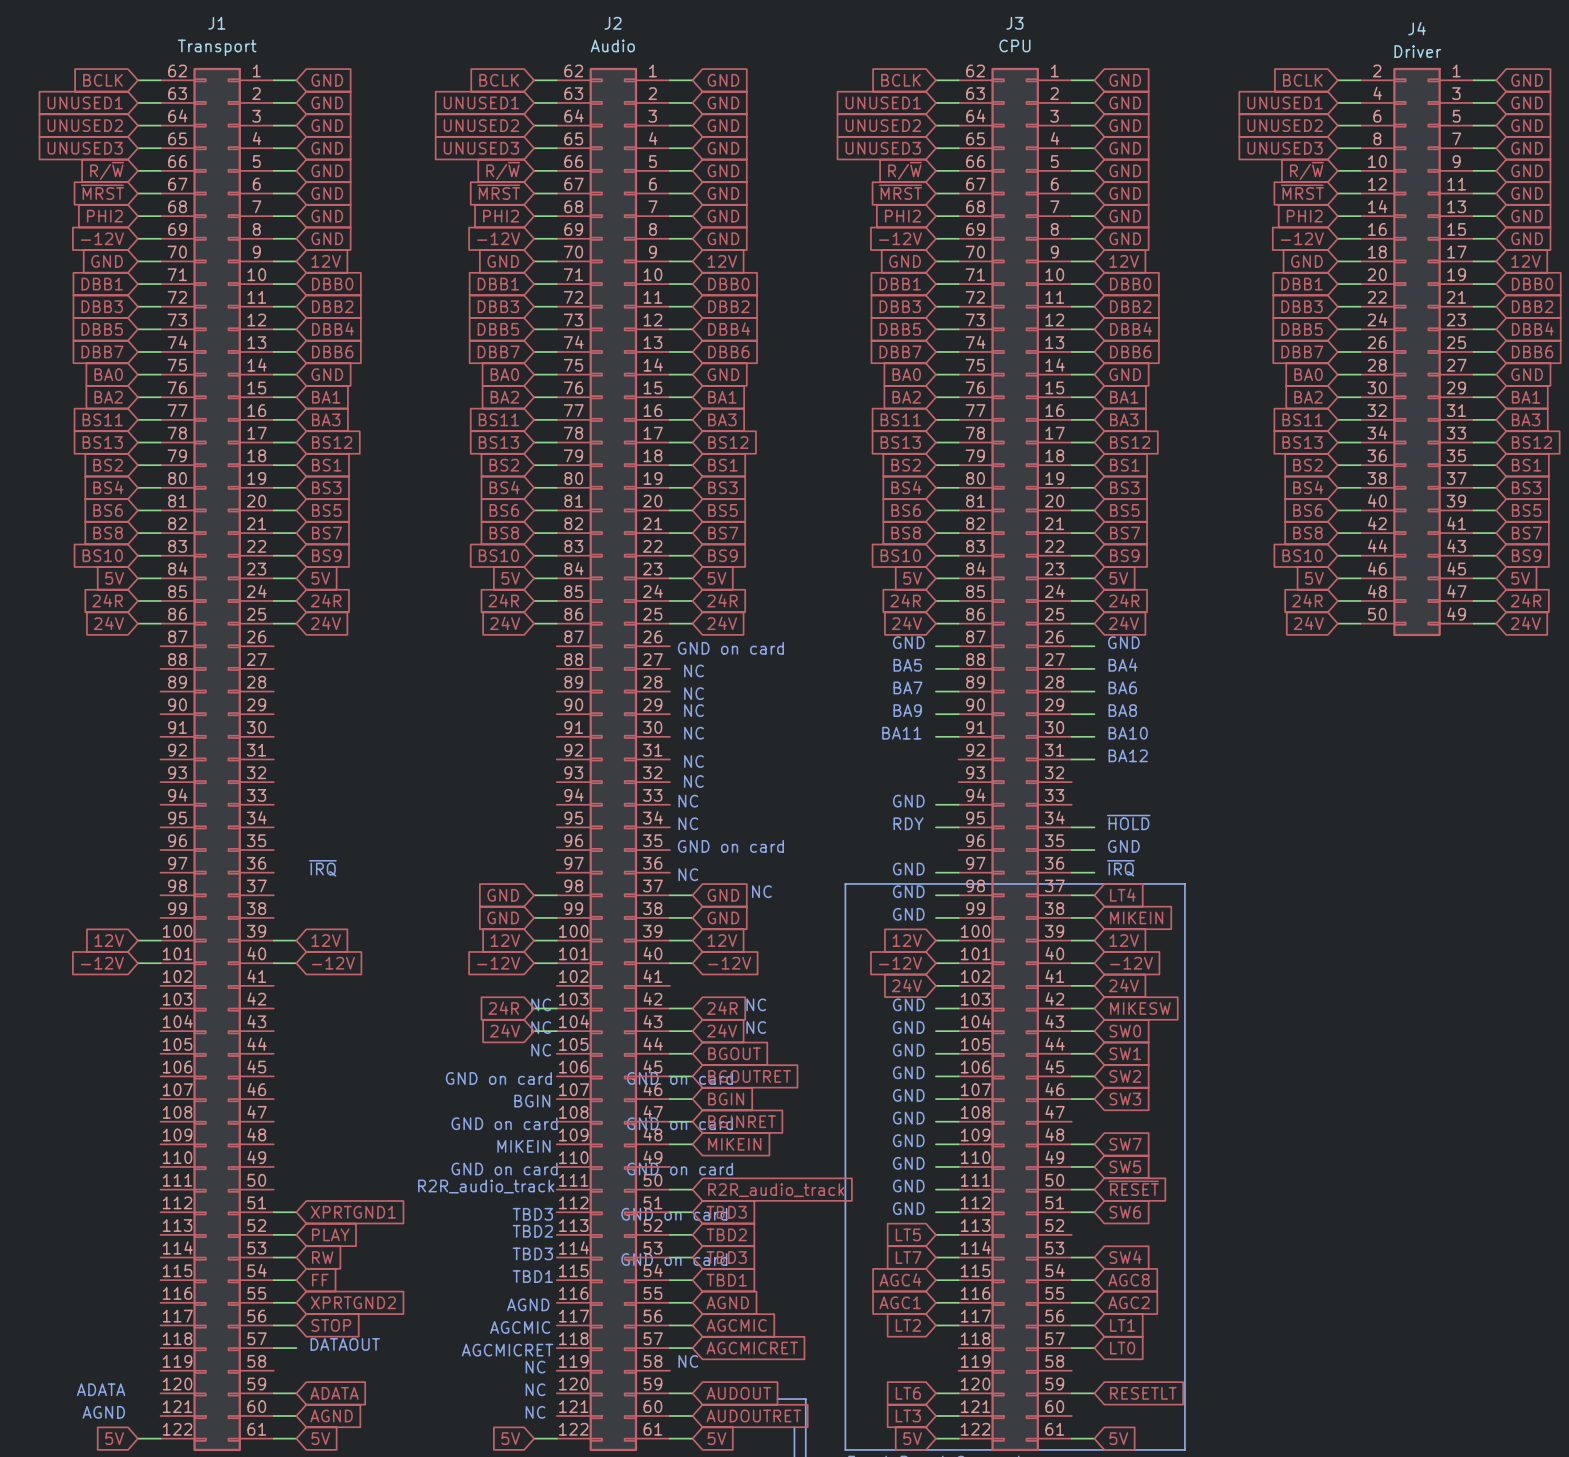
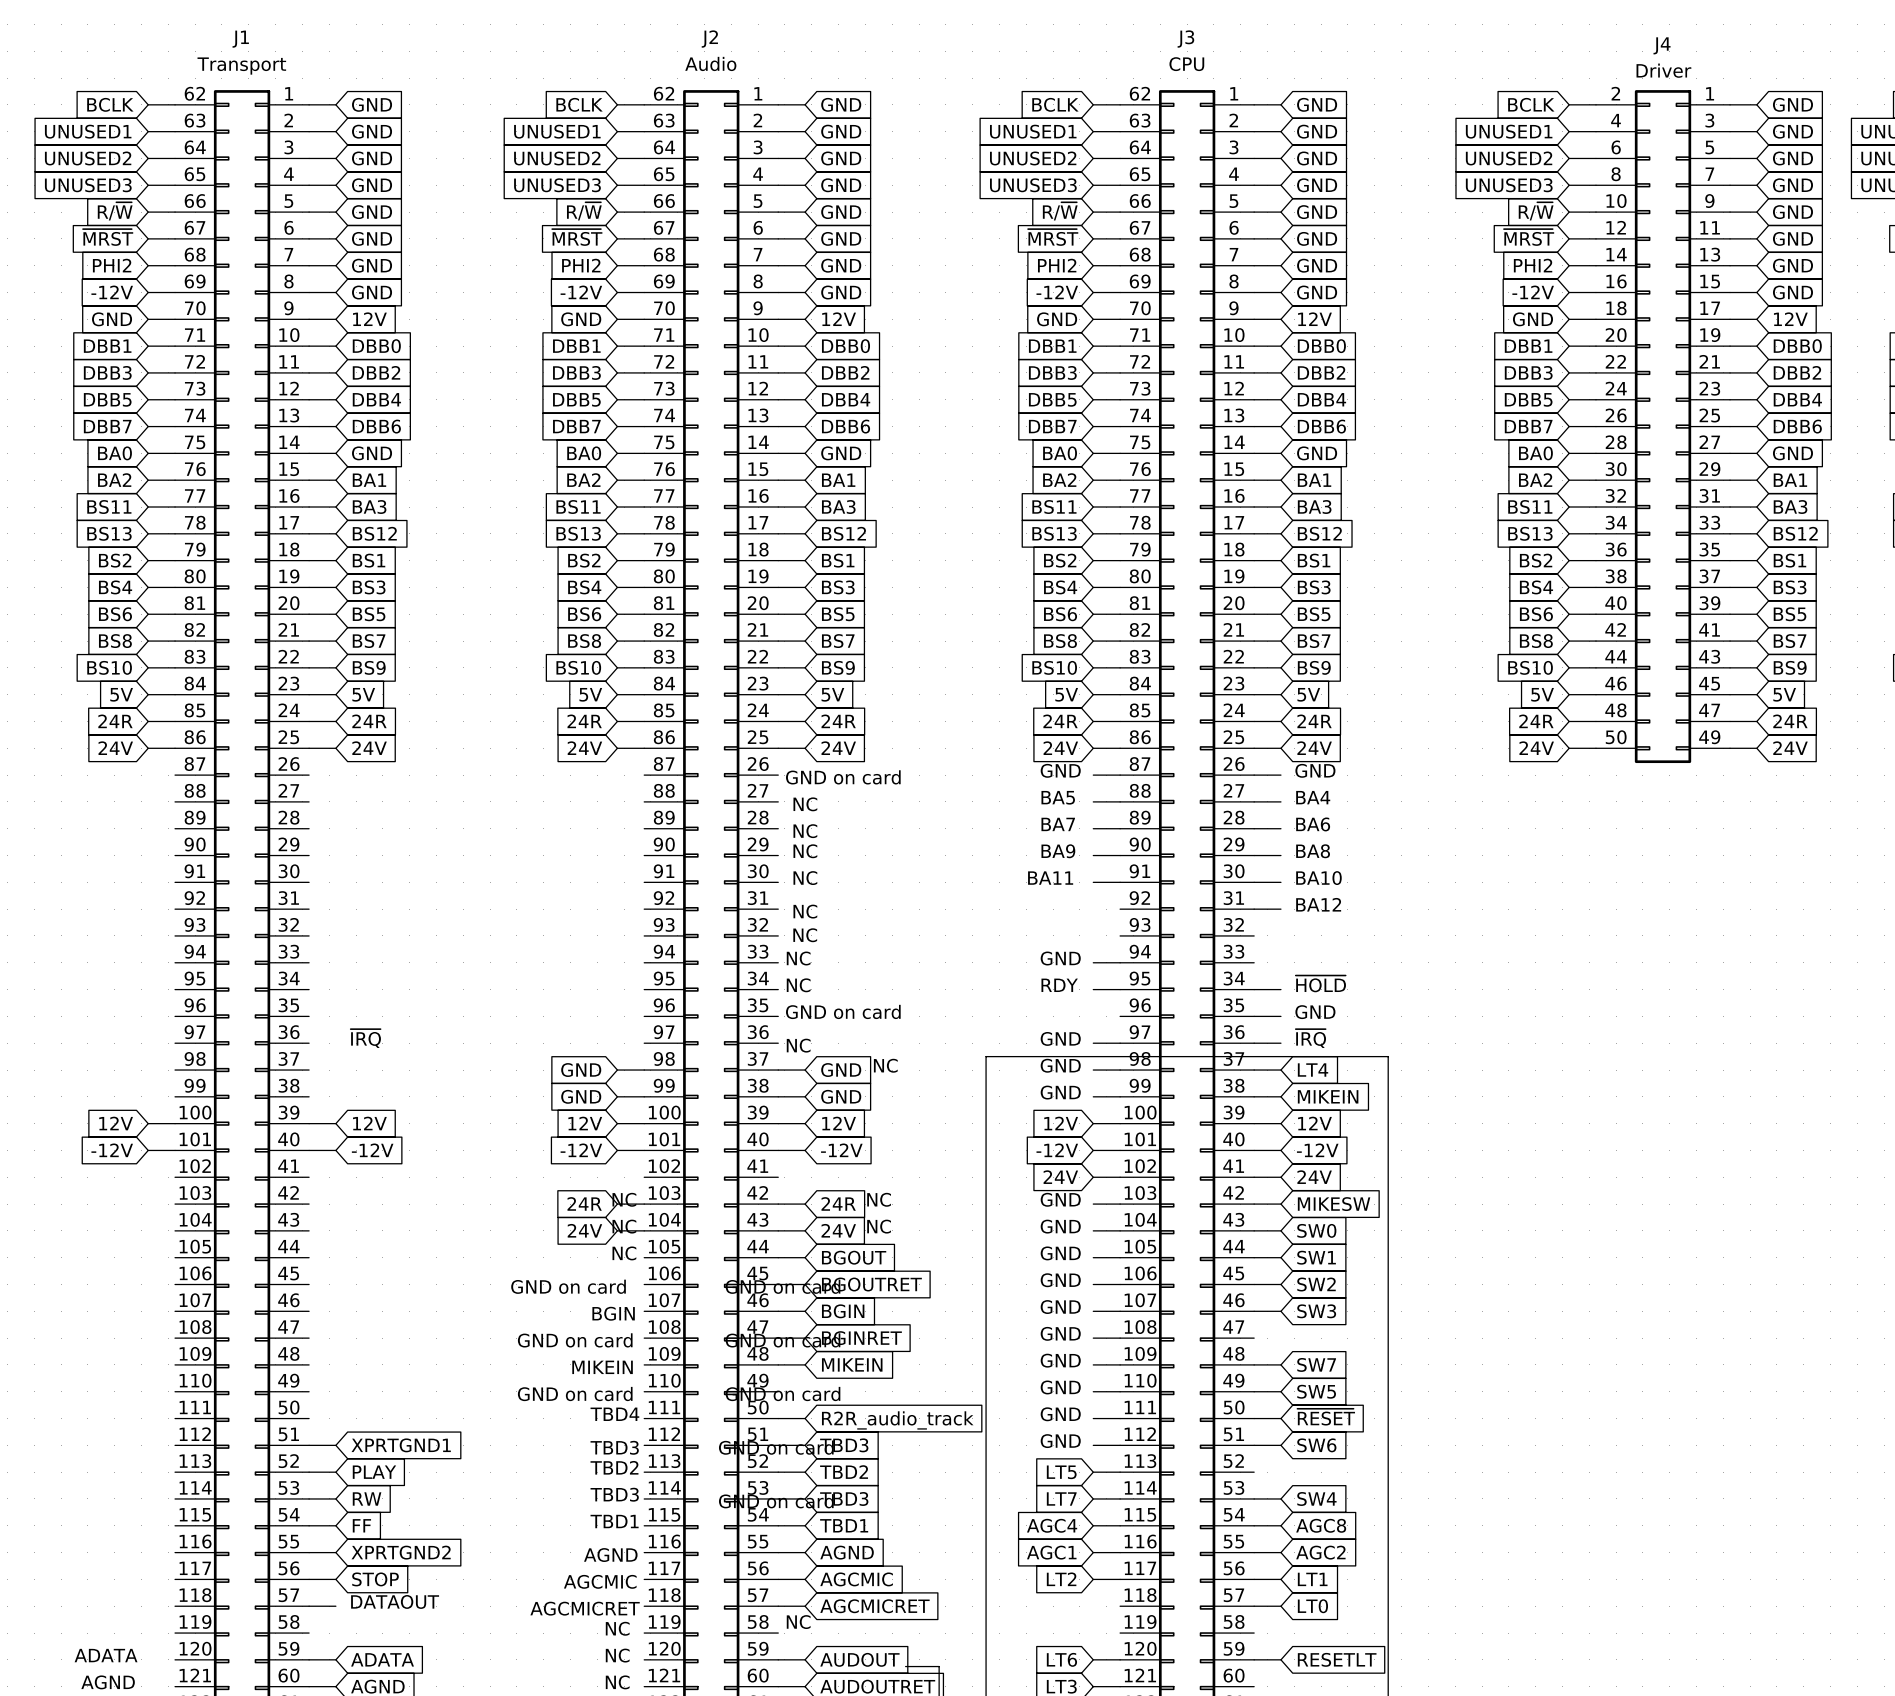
text: none -> TBD4 (614, 1414)
text: R2R_audio_track (486, 1186) -> none

